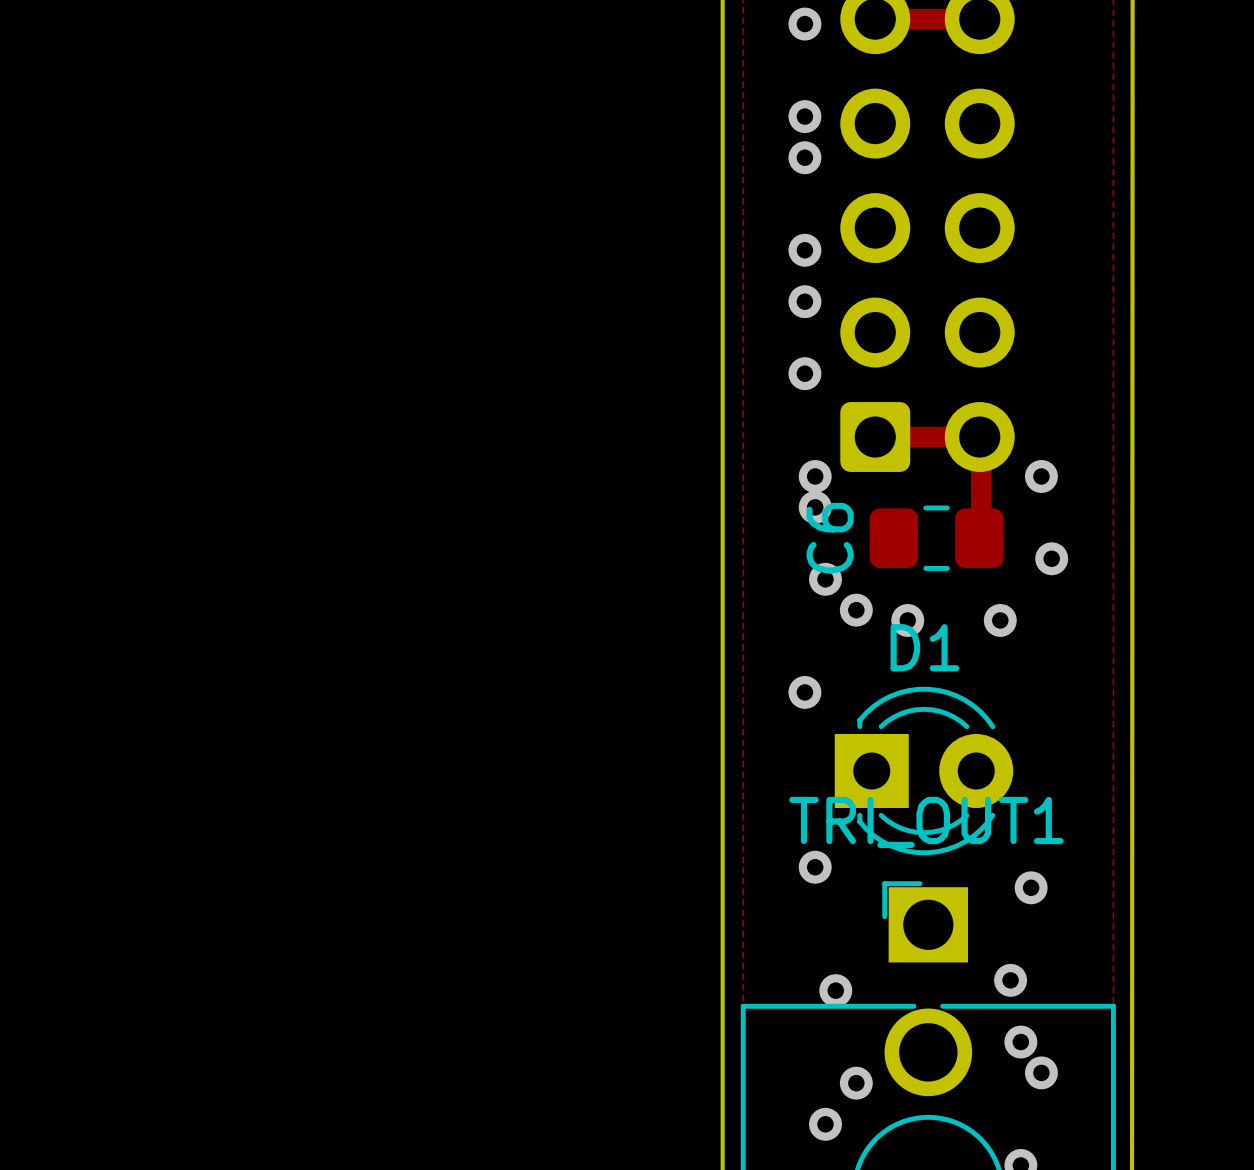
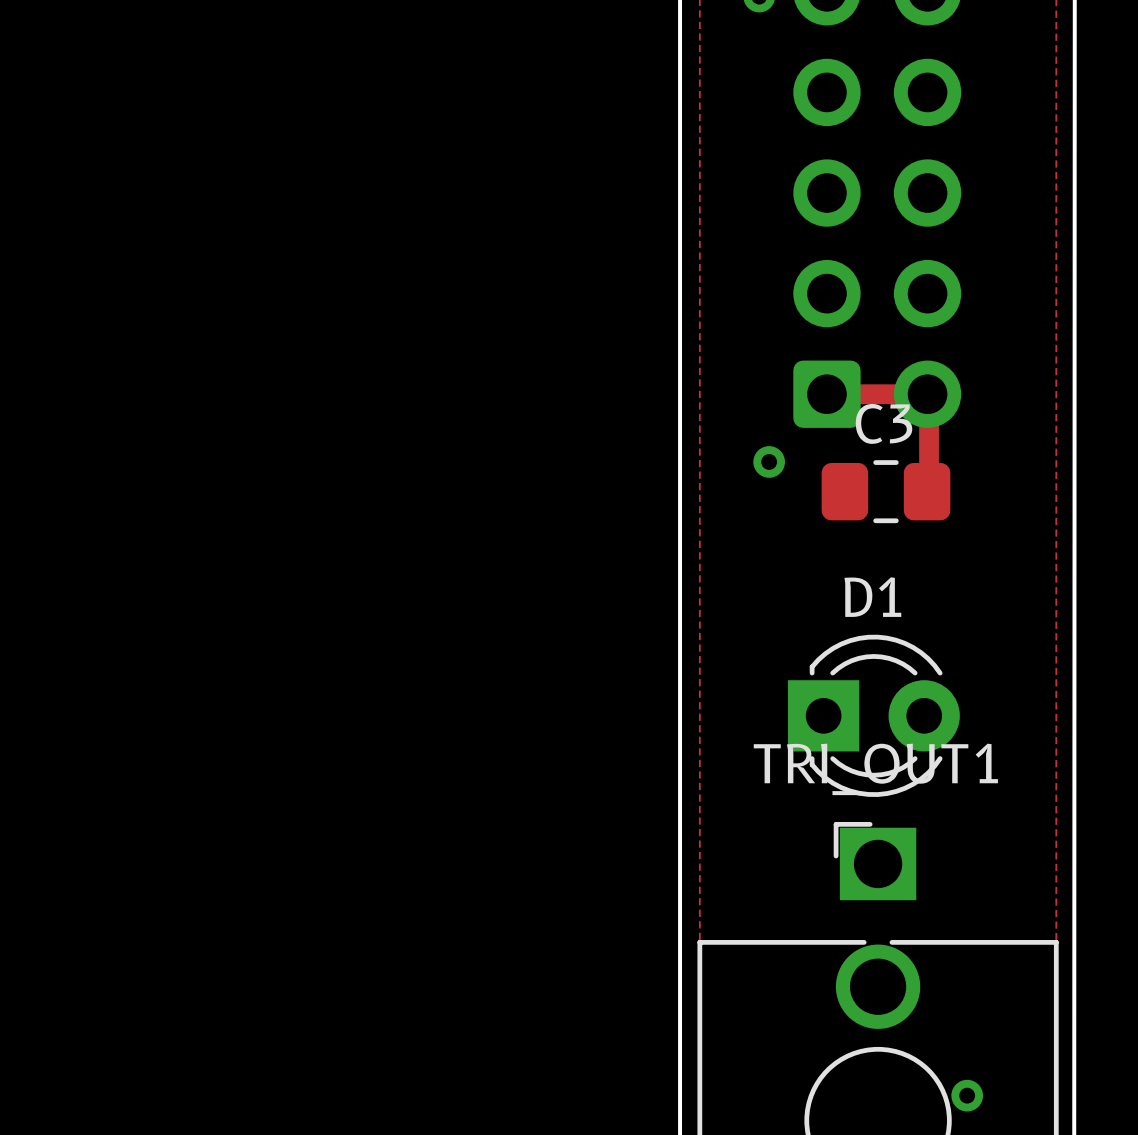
via: (804, 116) -> none
via: (804, 157) -> none
via: (804, 250) -> none
via: (804, 301) -> none
via: (804, 373) -> none
via: (815, 476) -> none
via: (1041, 476) -> none
C6 name: C6 (830, 538) -> C3 (883, 423)
via: (1051, 558) -> none
via: (825, 579) -> none
via: (856, 610) -> none
via: (907, 620) -> none
via: (1000, 620) -> none
via: (804, 692) -> none
via: (815, 867) -> none
via: (1031, 887) -> none
via: (1010, 980) -> none
via: (835, 990) -> none
via: (1020, 1042) -> none
via: (1041, 1072) -> none
via: (856, 1083) -> none
via: (825, 1124) -> none

